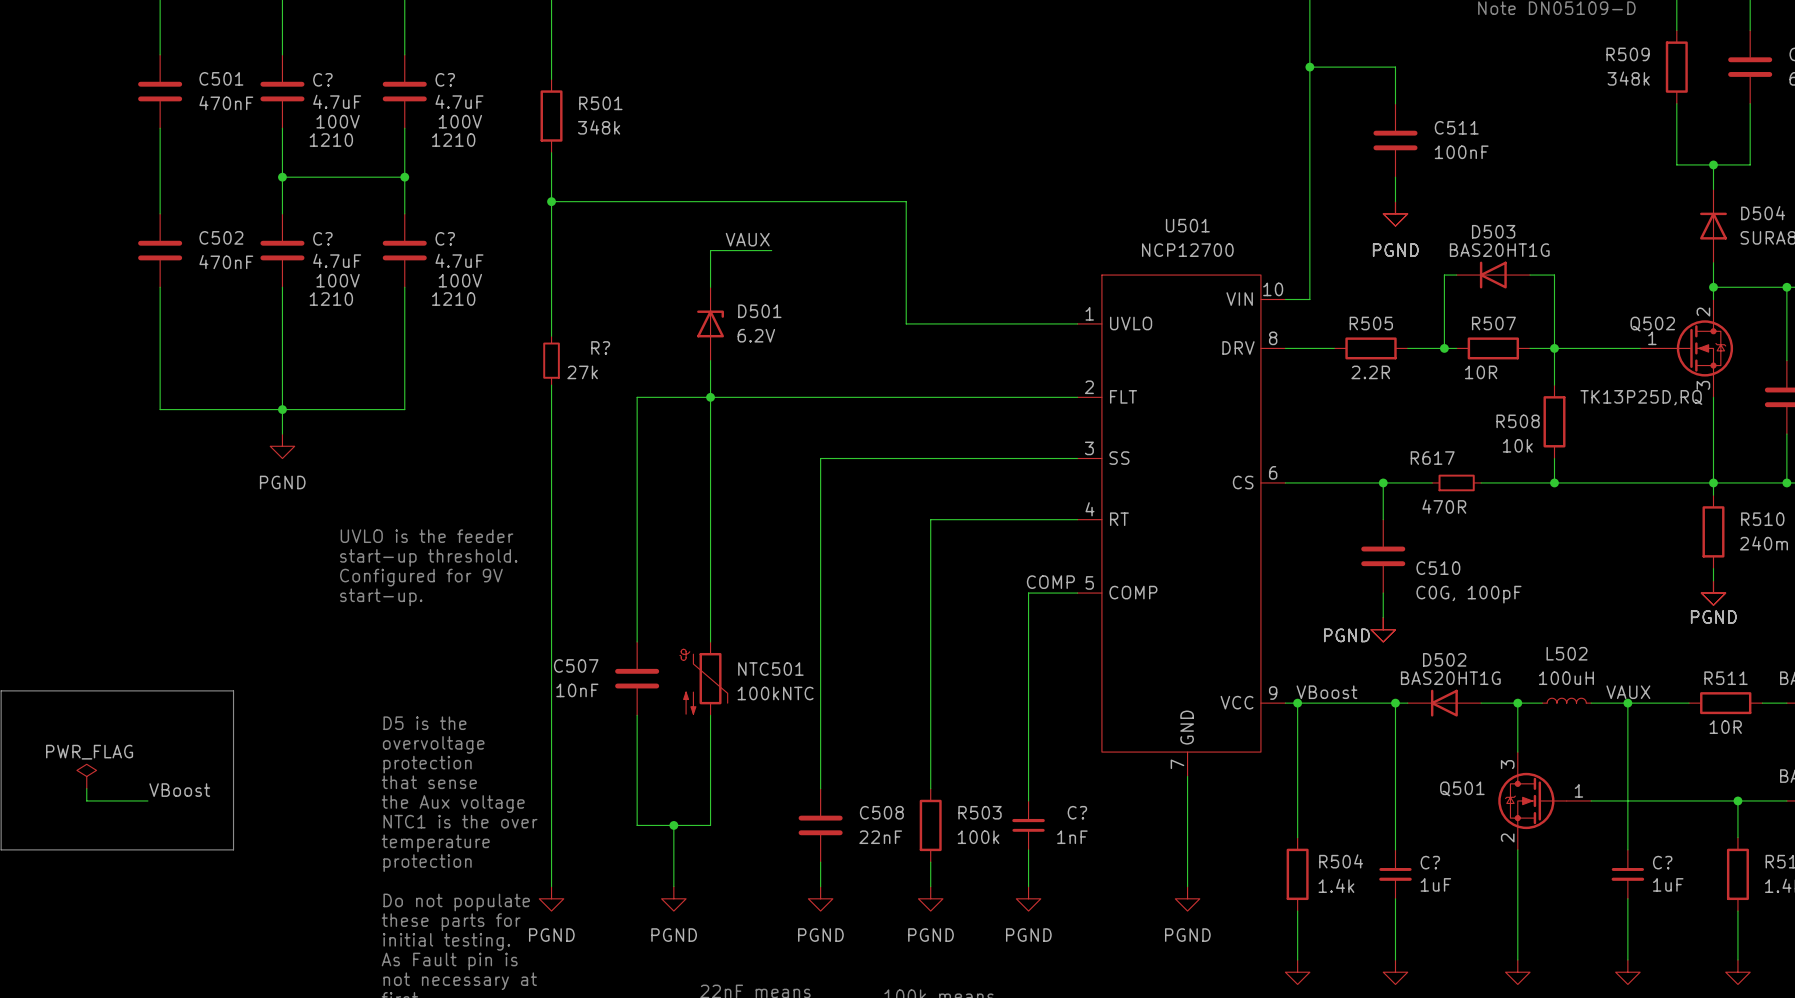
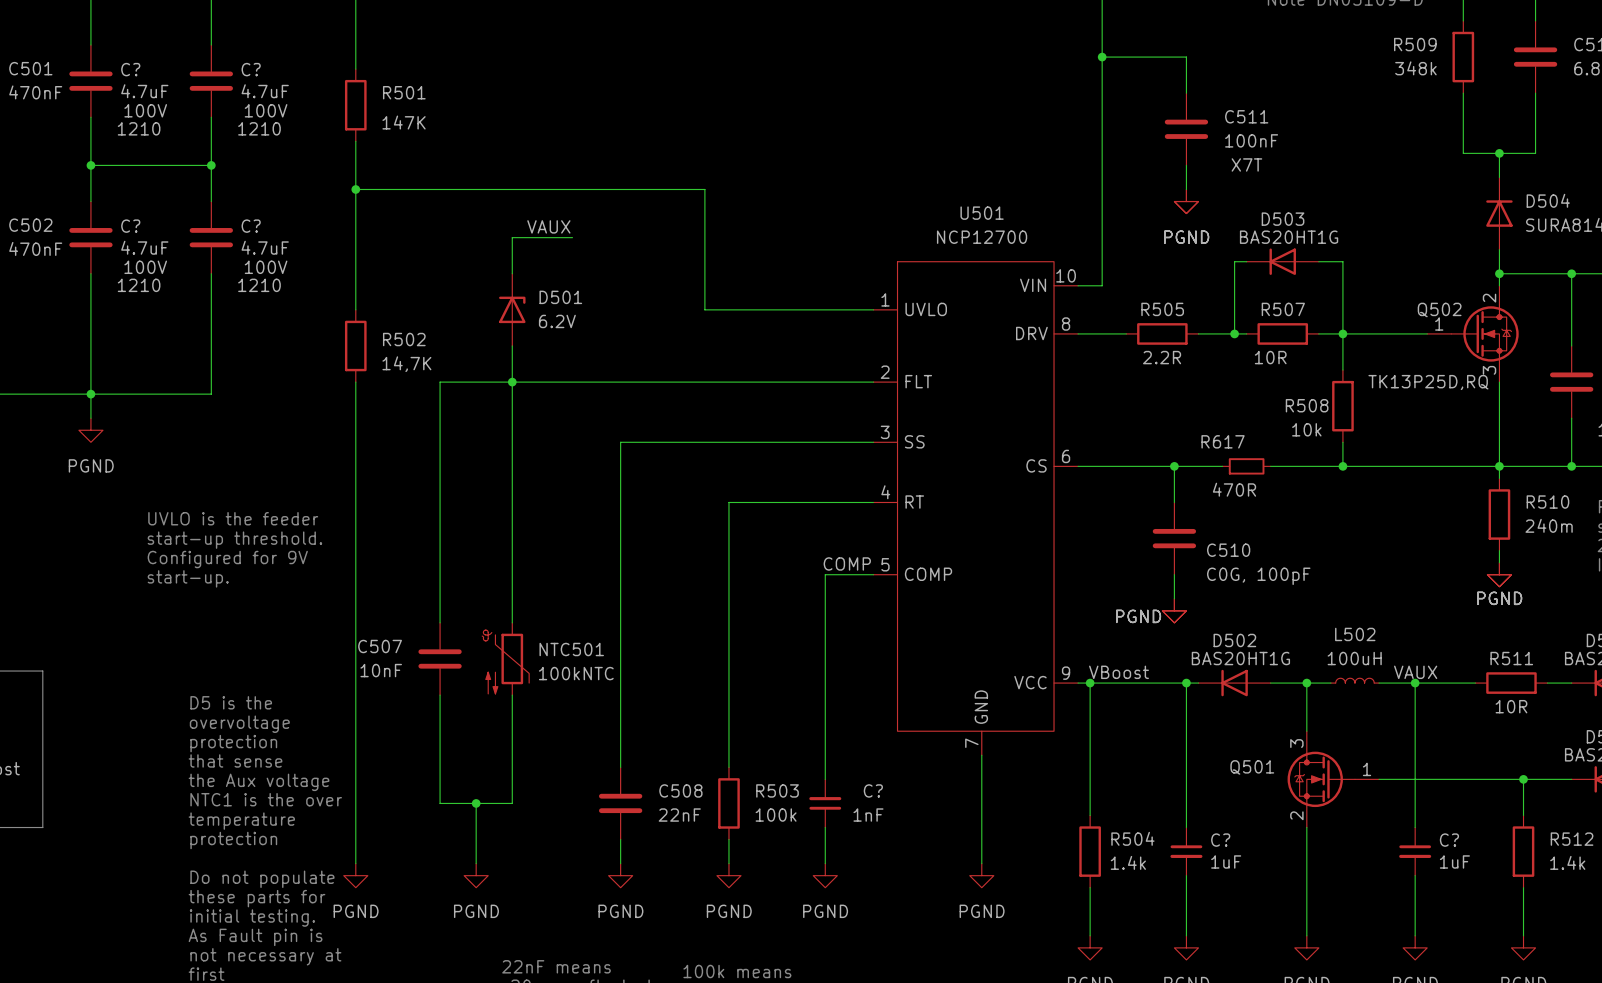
R501 value: 348k (599, 127) -> 147K (404, 122)
C511 text: none -> X7T (1246, 164)
R?: 27k (551, 360) -> none
R502: none -> 14,7K (355, 345)

